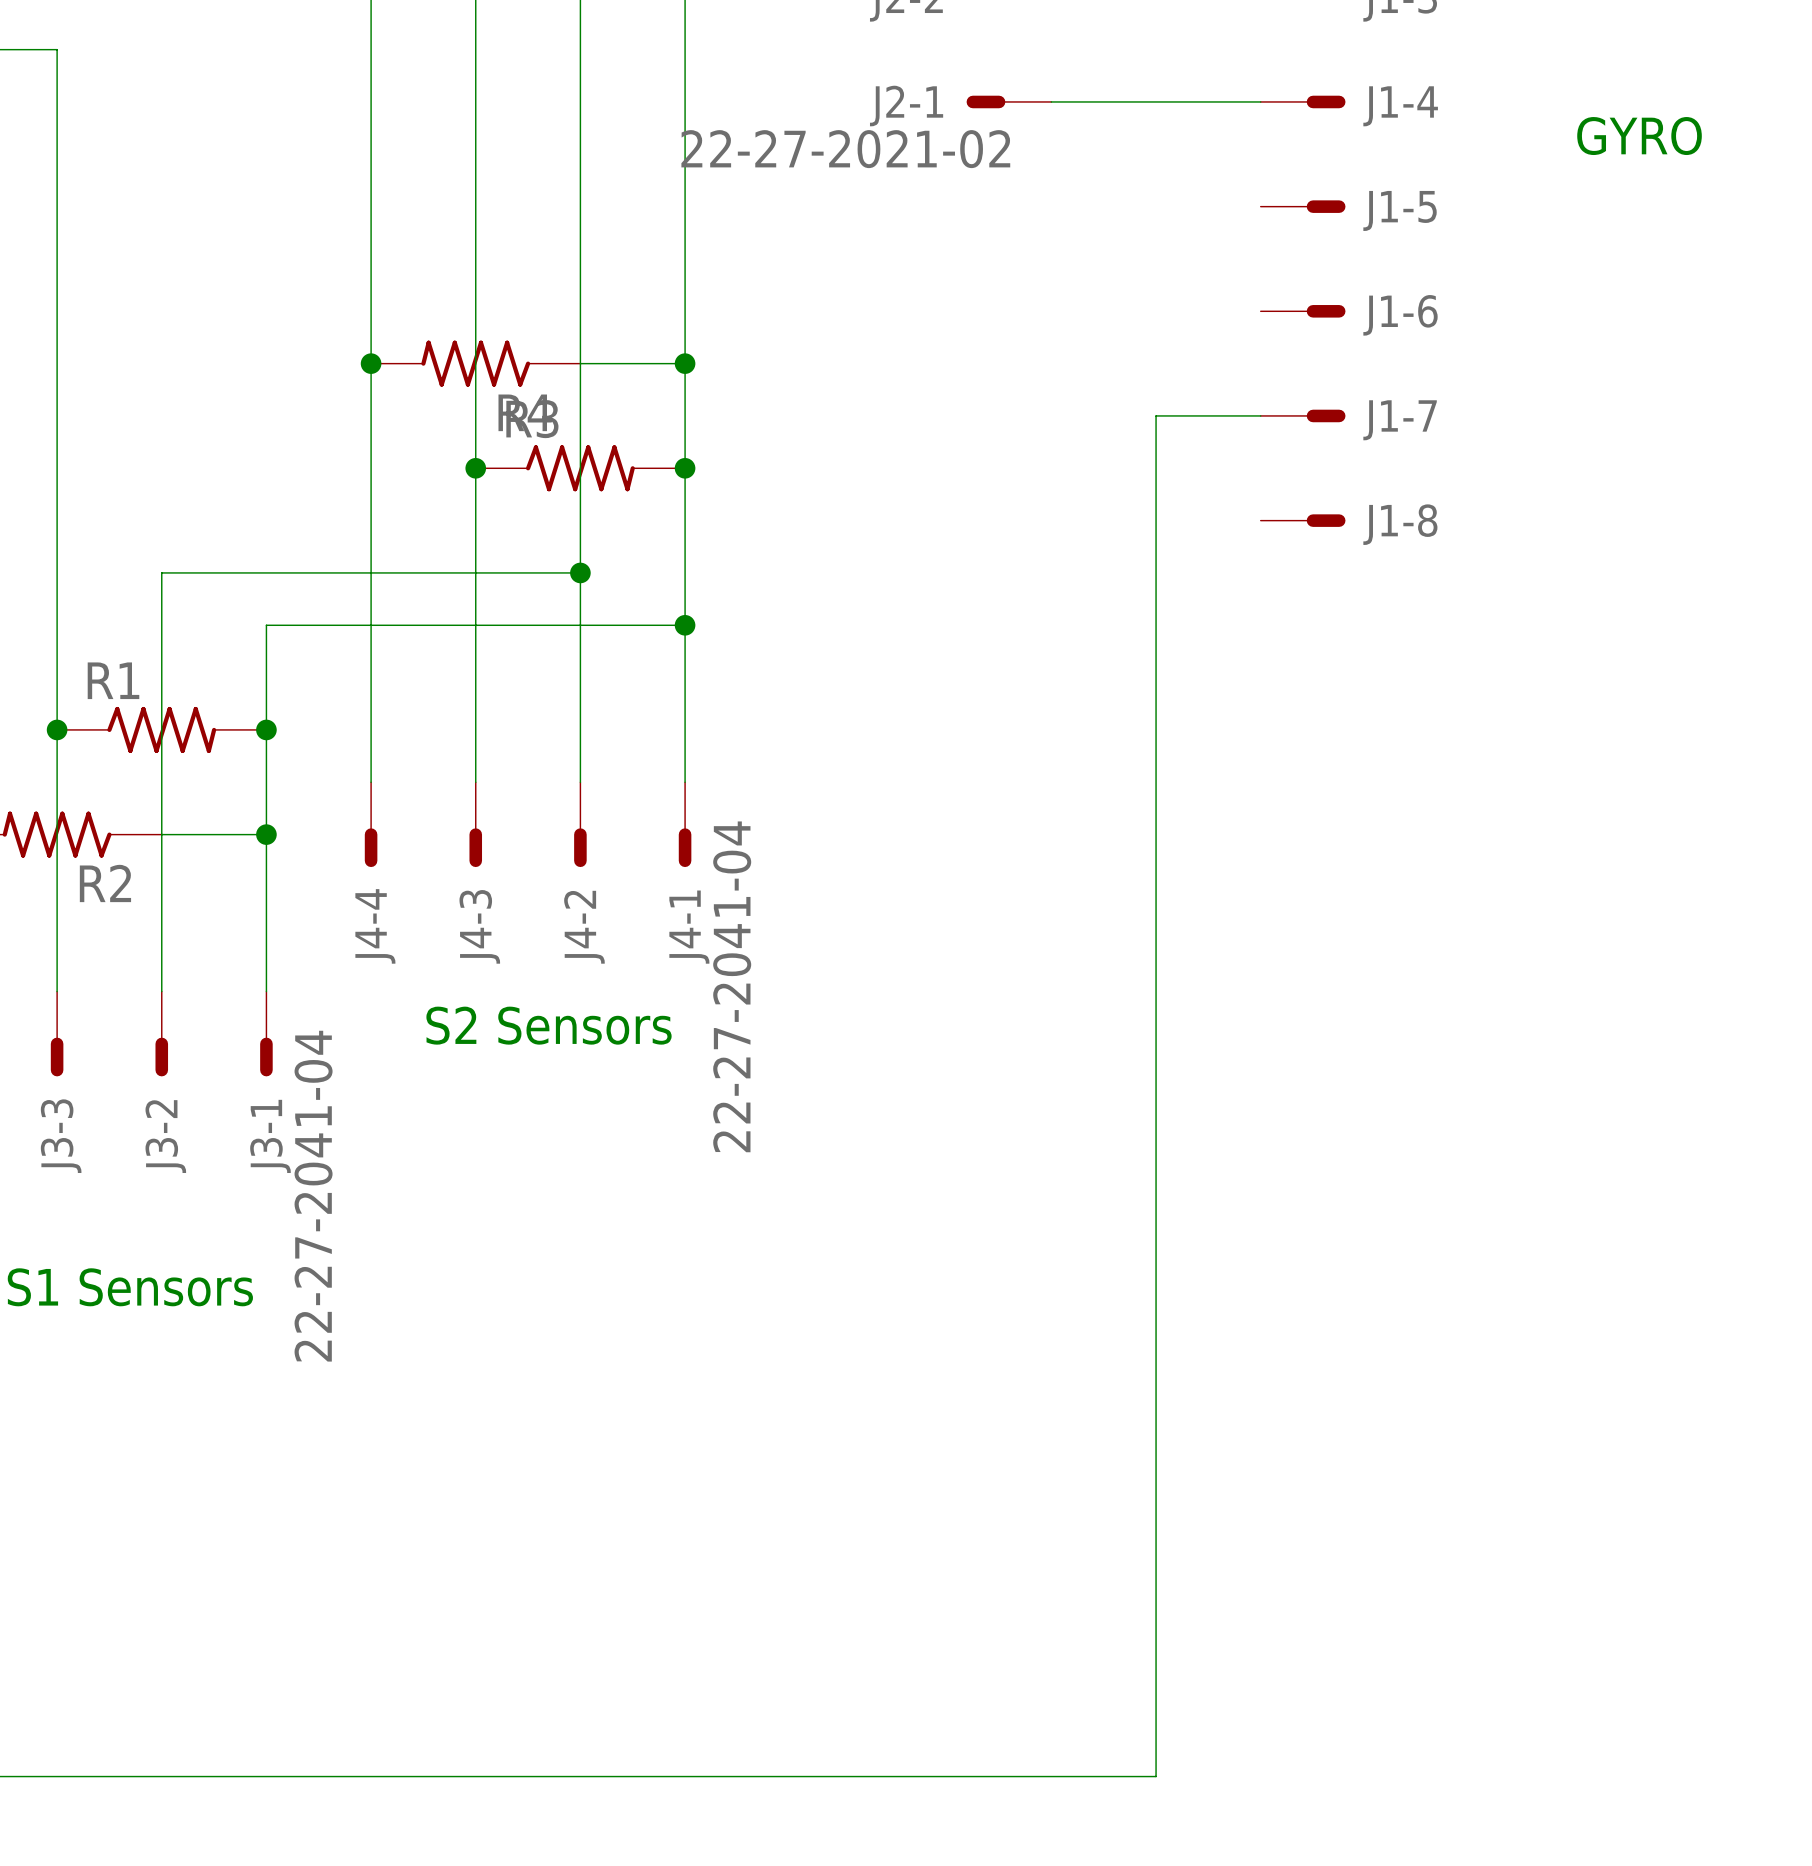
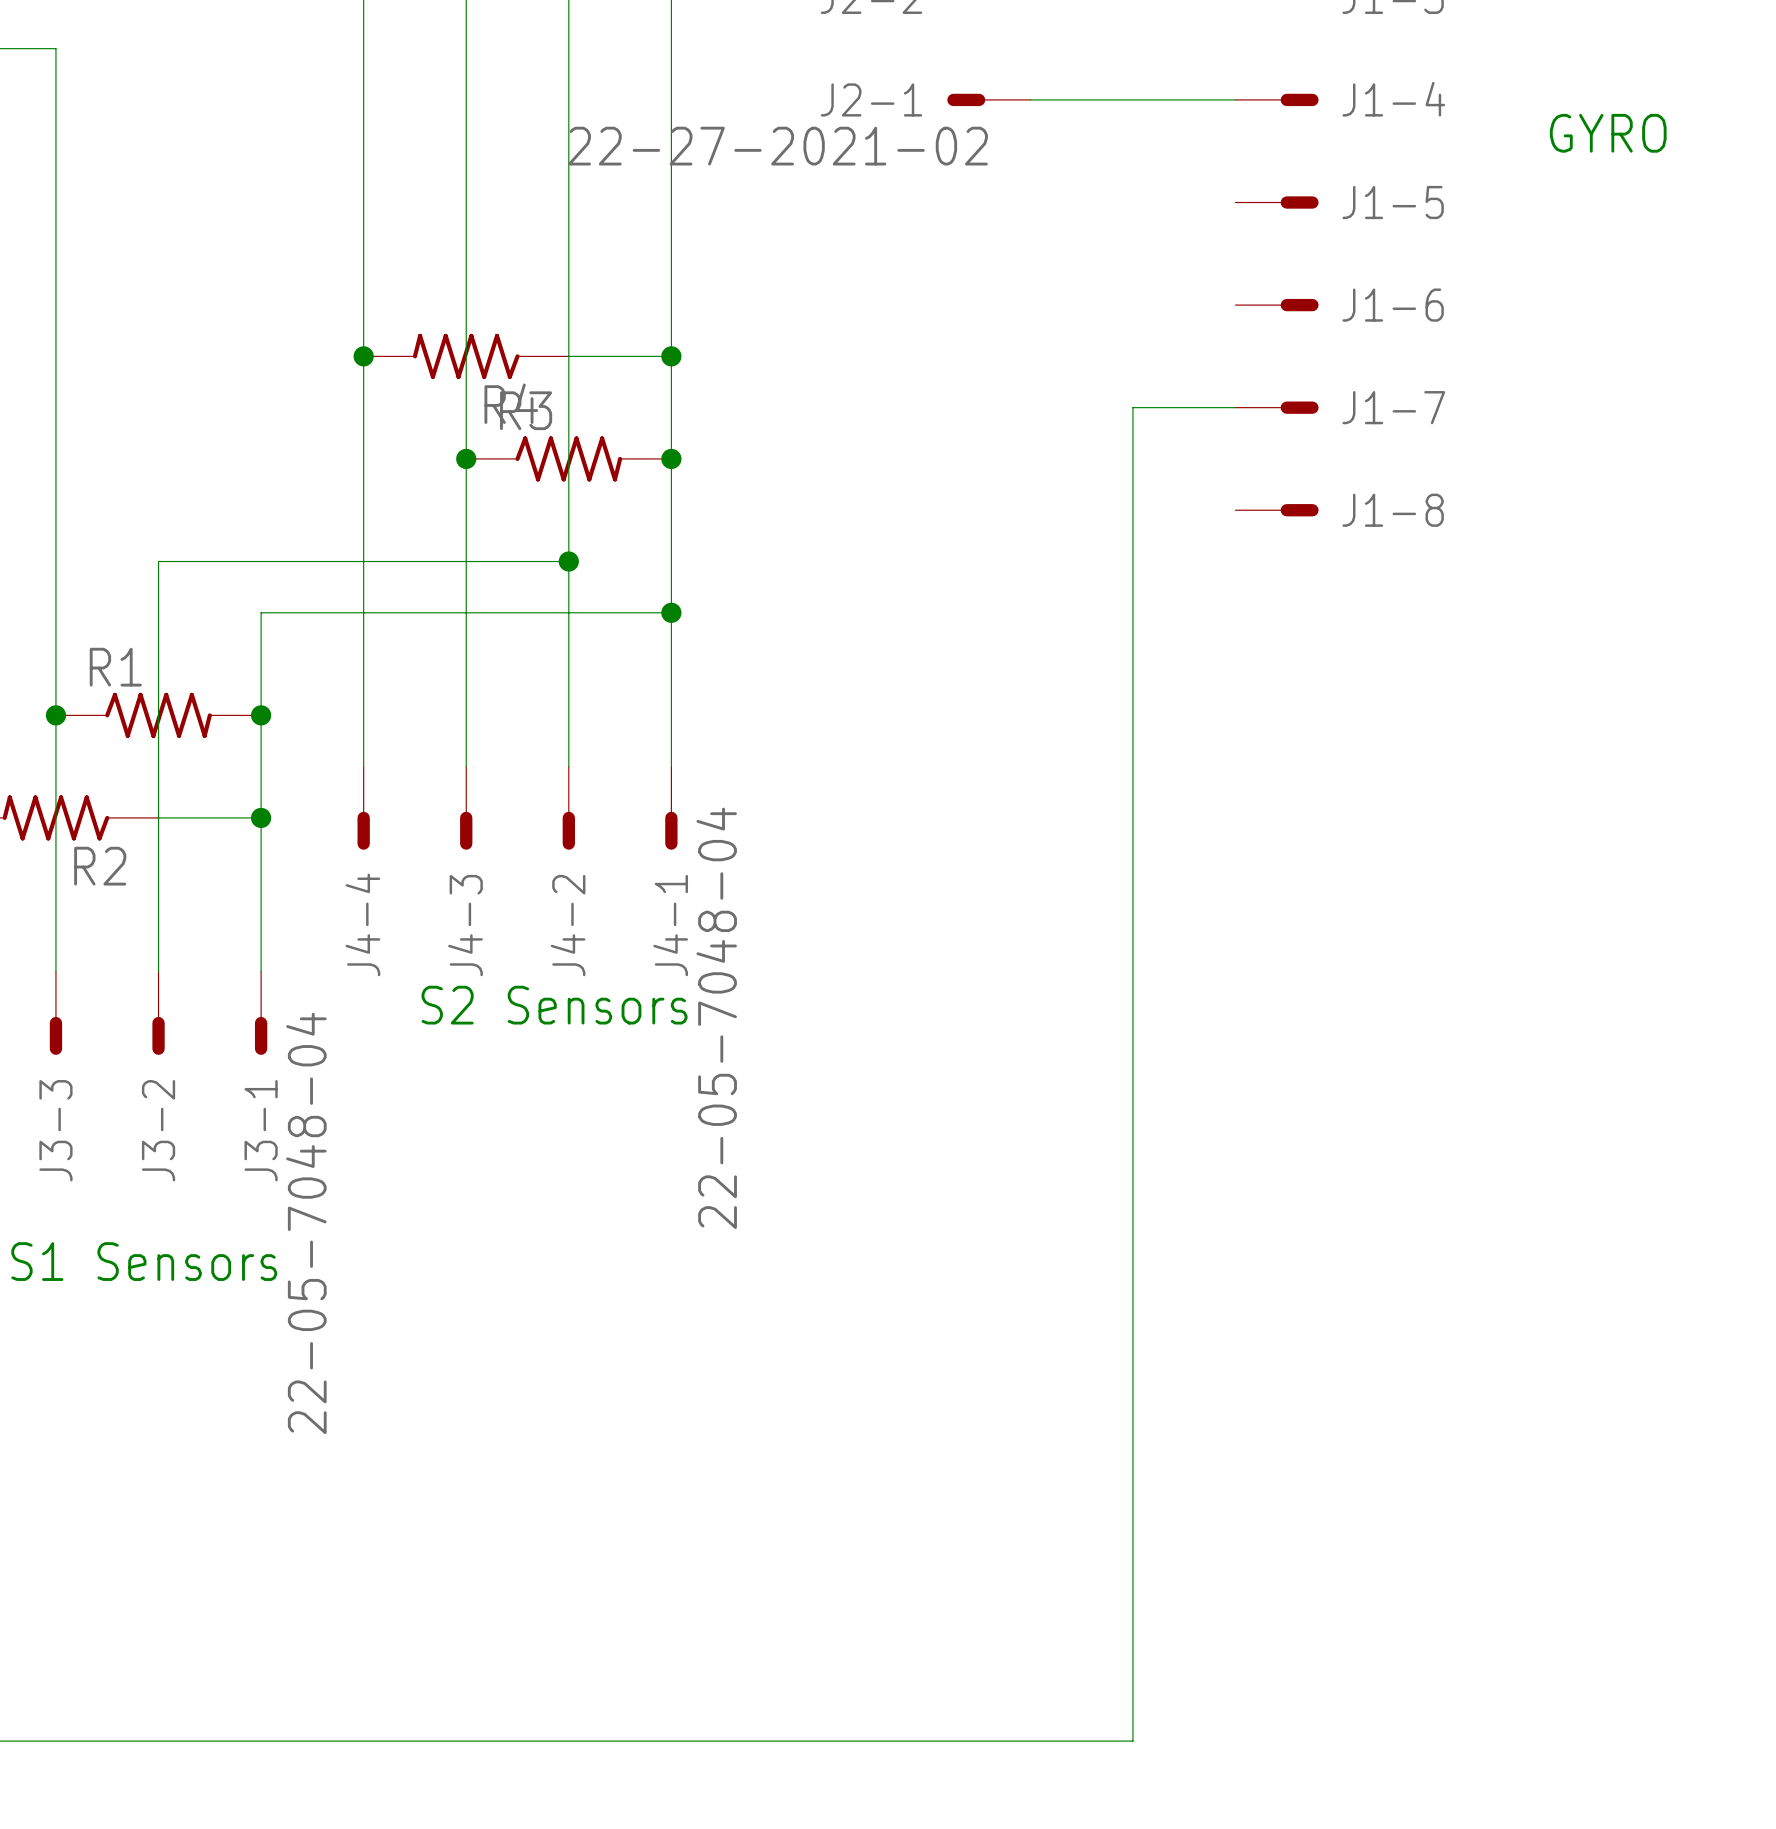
J4-1 value: 22-27-2041-04 (732, 986) -> 22-05-7048-04 (716, 1018)
J3-1 value: 22-27-2041-04 (313, 1196) -> 22-05-7048-04 (306, 1223)

